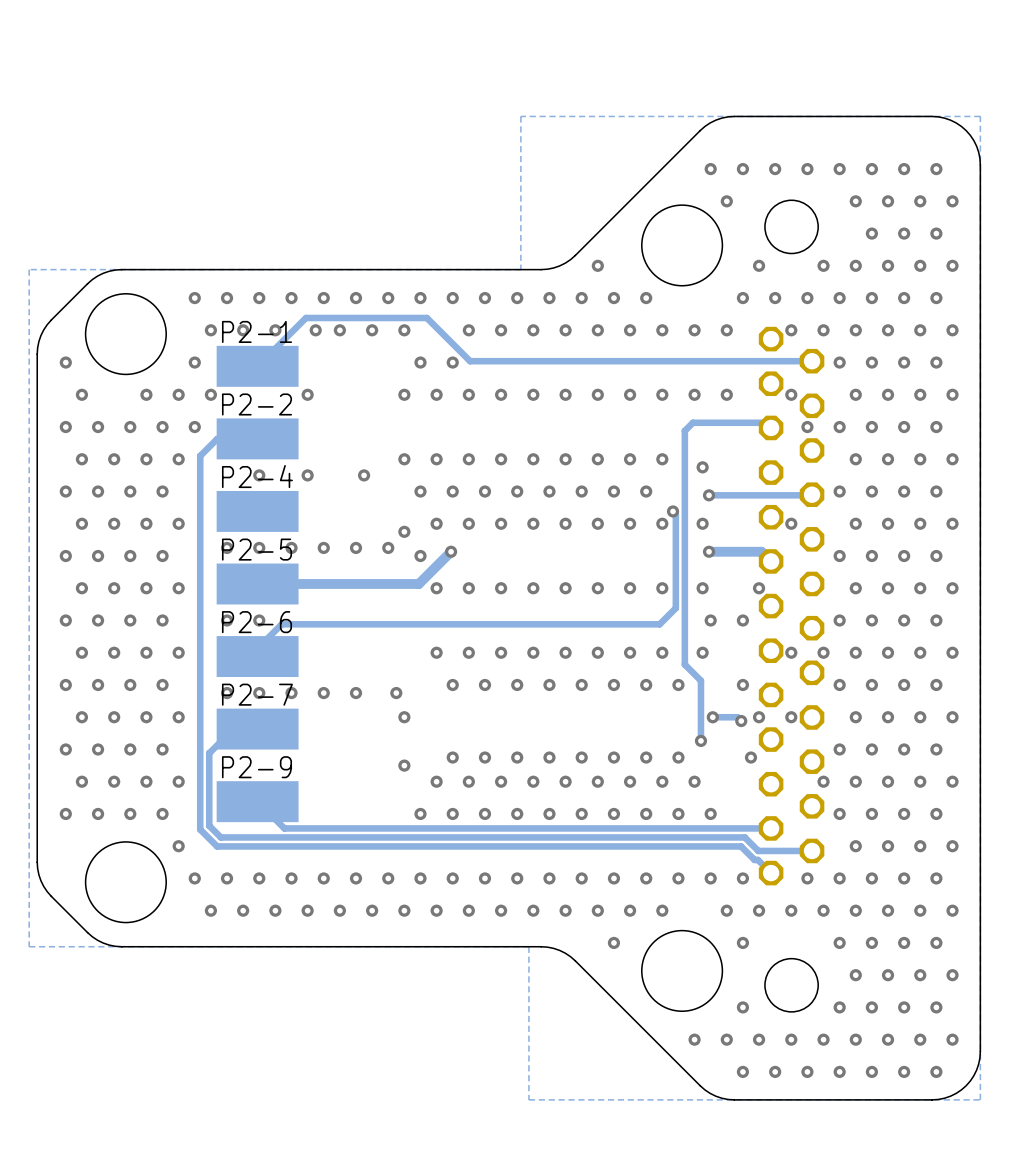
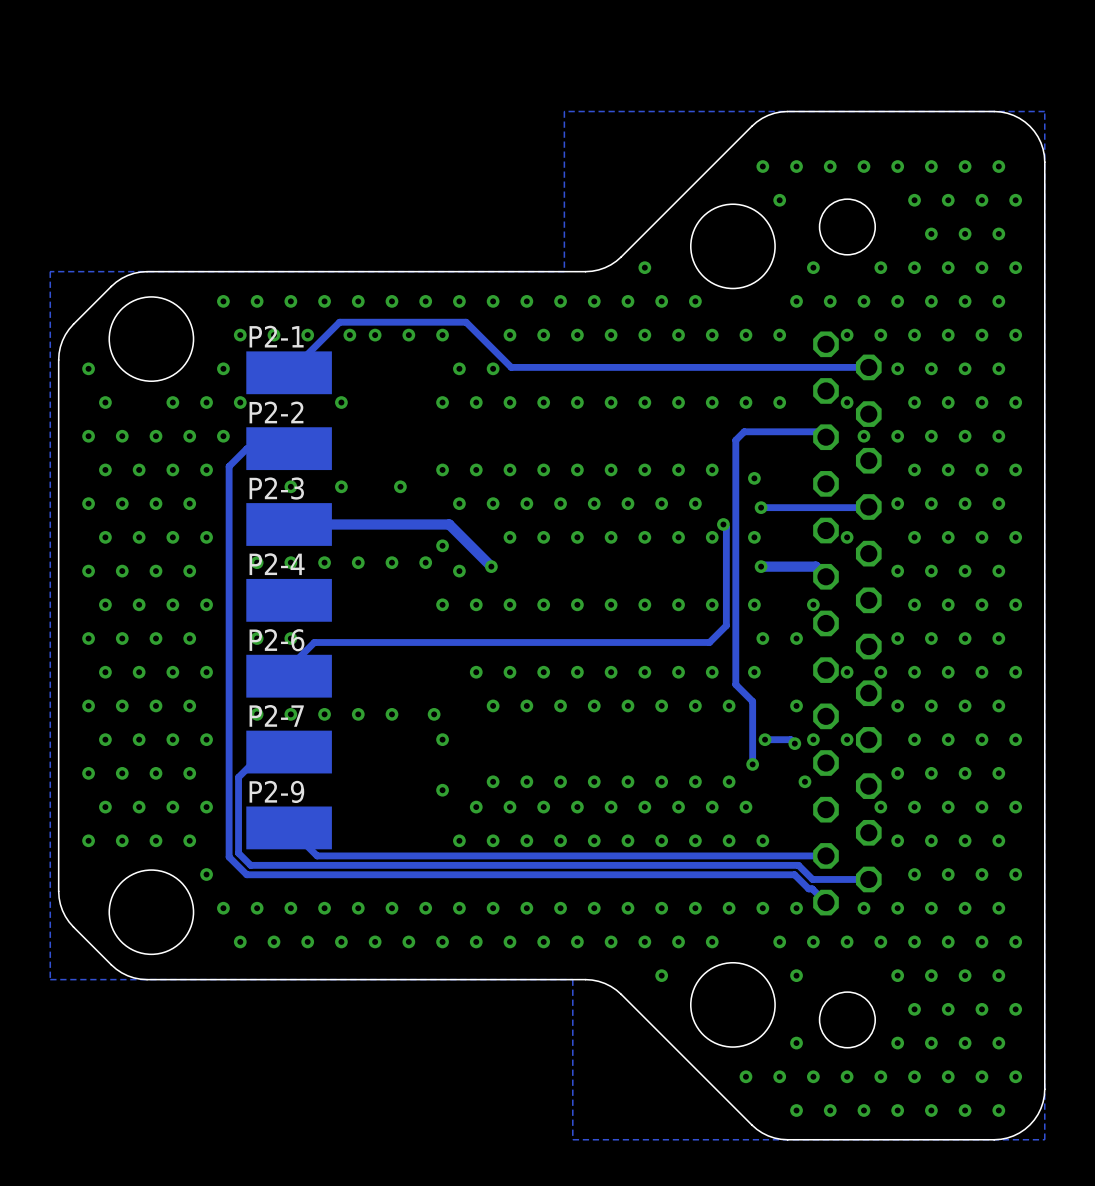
P2-4 name: P2-4 (257, 476) -> P2-3 (276, 488)
via position: (436, 523) -> (442, 604)
P2-5 name: P2-5 (256, 549) -> P2-4 (277, 564)
track: (451, 551) (418, 583) (257, 583) -> (491, 566) (449, 524) (289, 524)

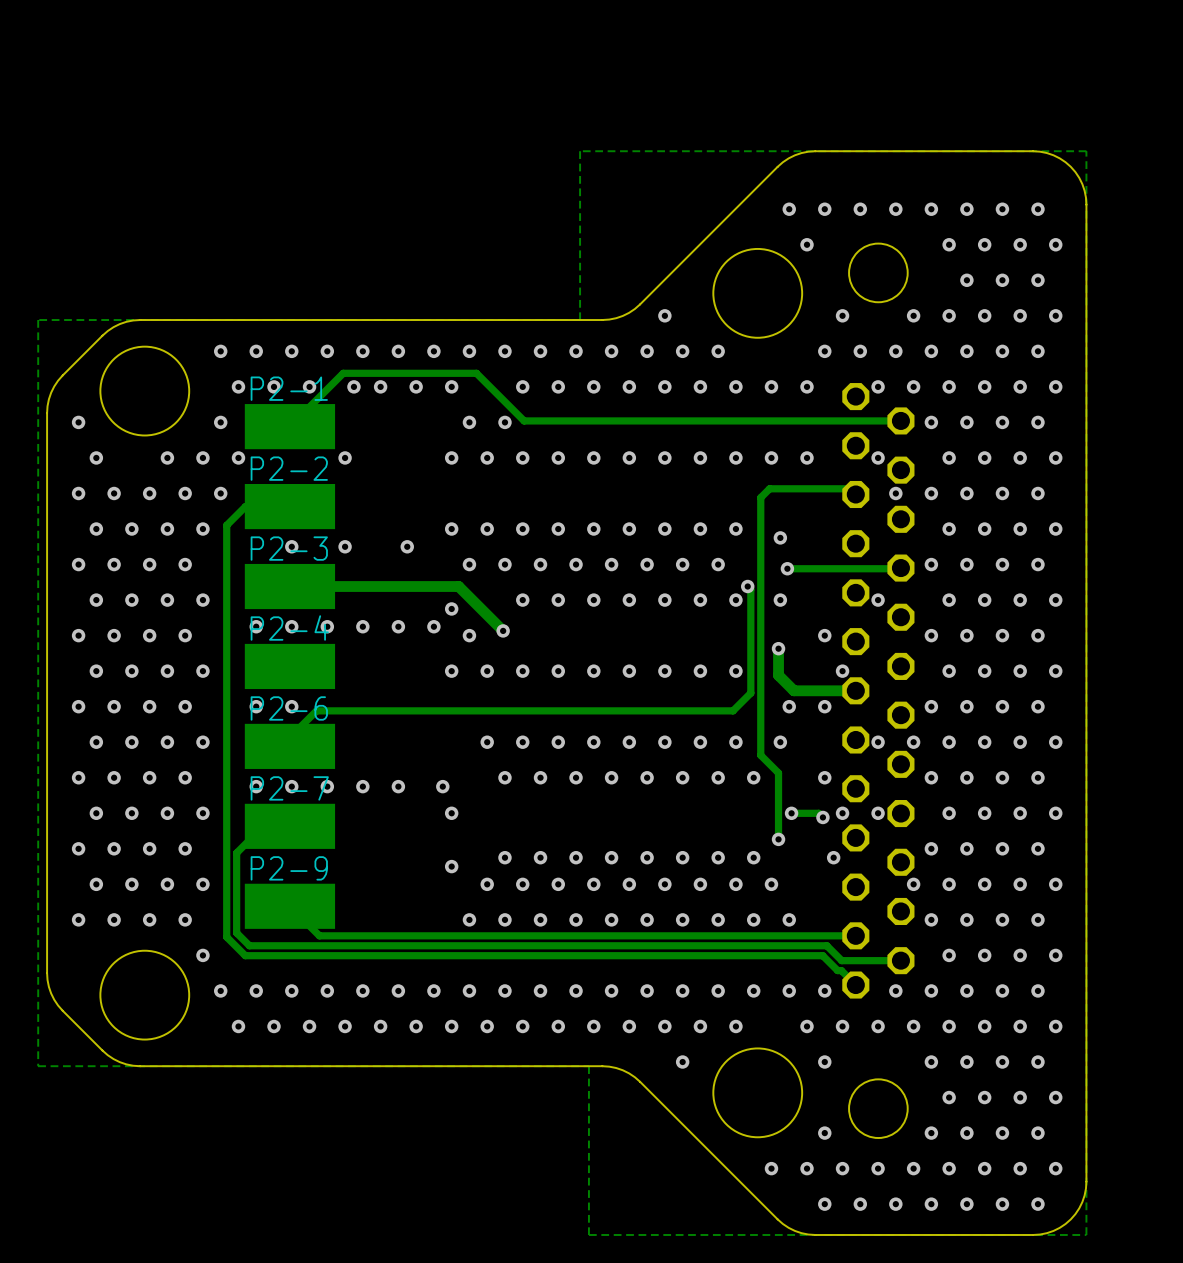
track: (761, 566) (815, 566) (825, 576) -> none
via: (761, 566) -> none
via: none -> (824, 635)
track: none -> (778, 648) (778, 675) (793, 690) (855, 690)
via: none -> (778, 648)
via: (754, 604) -> none

